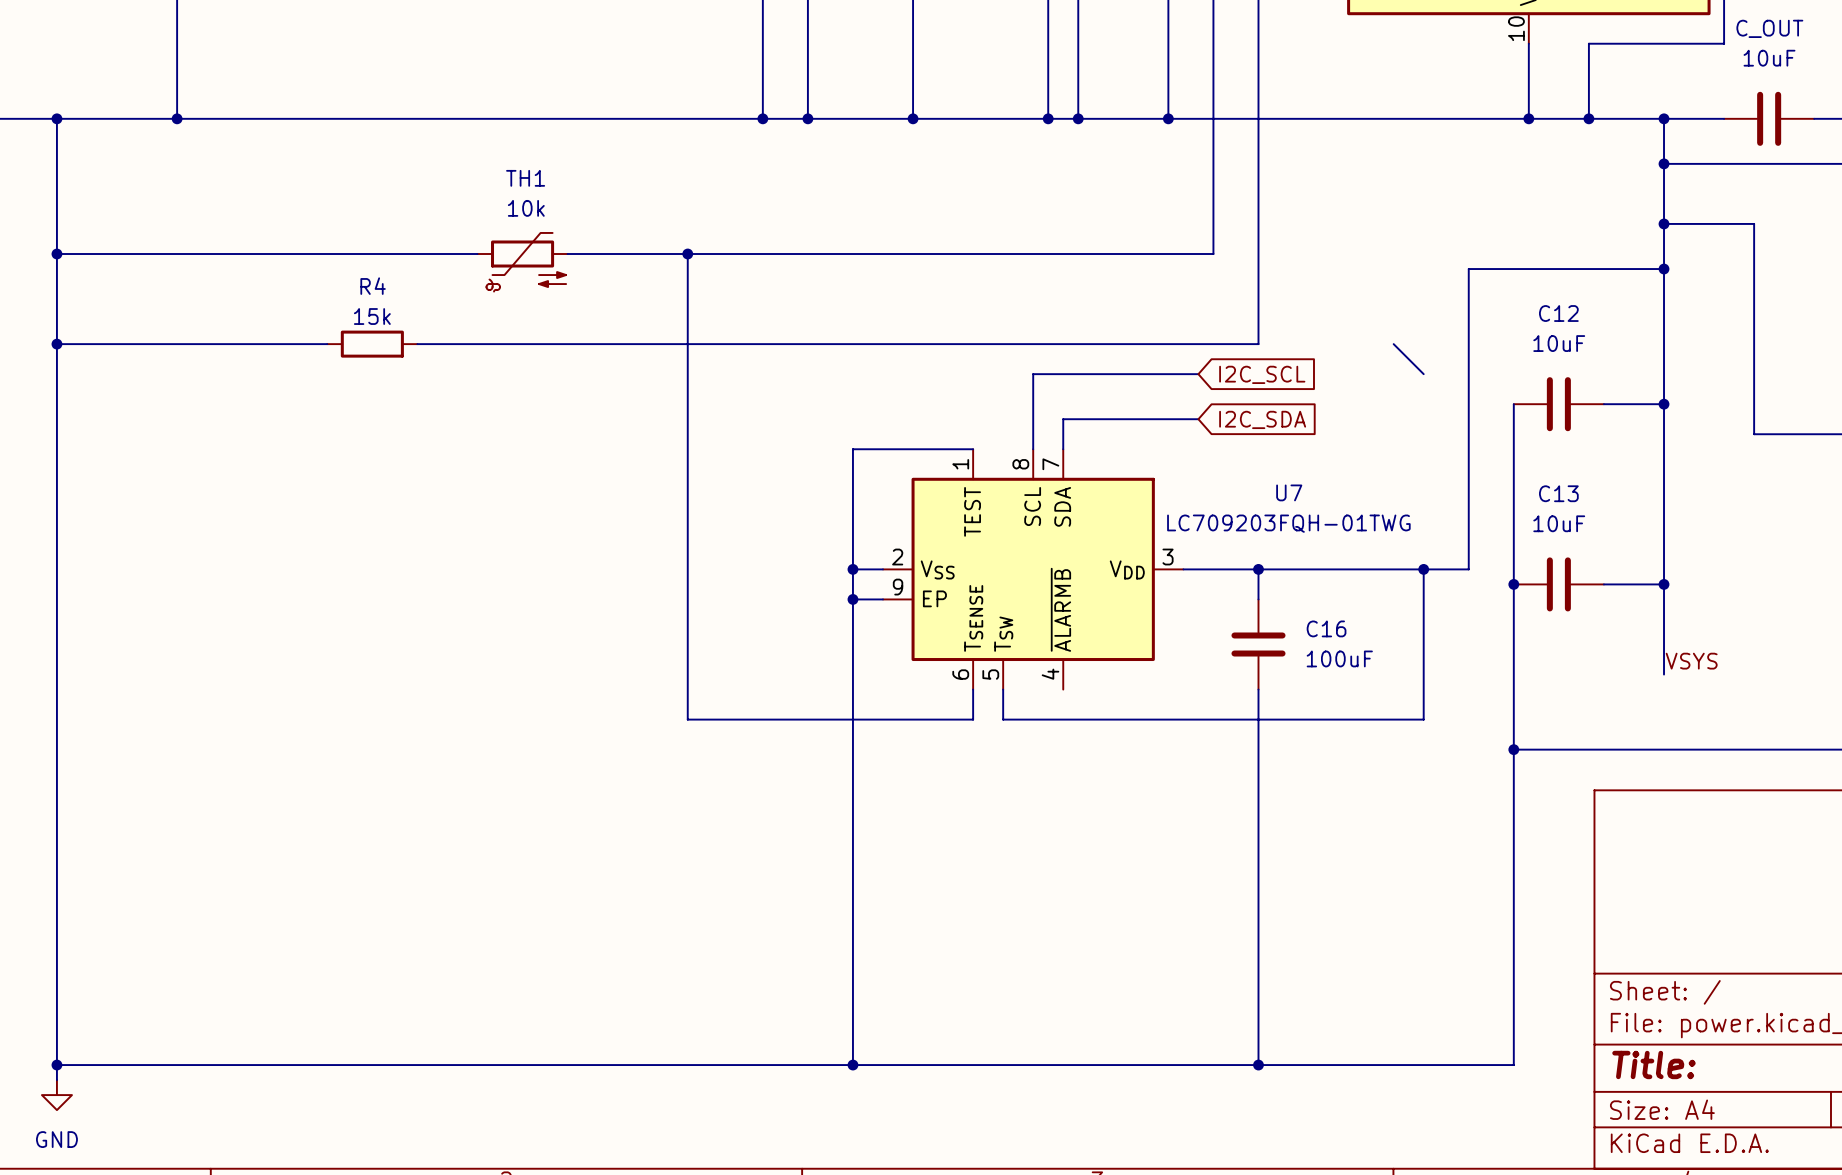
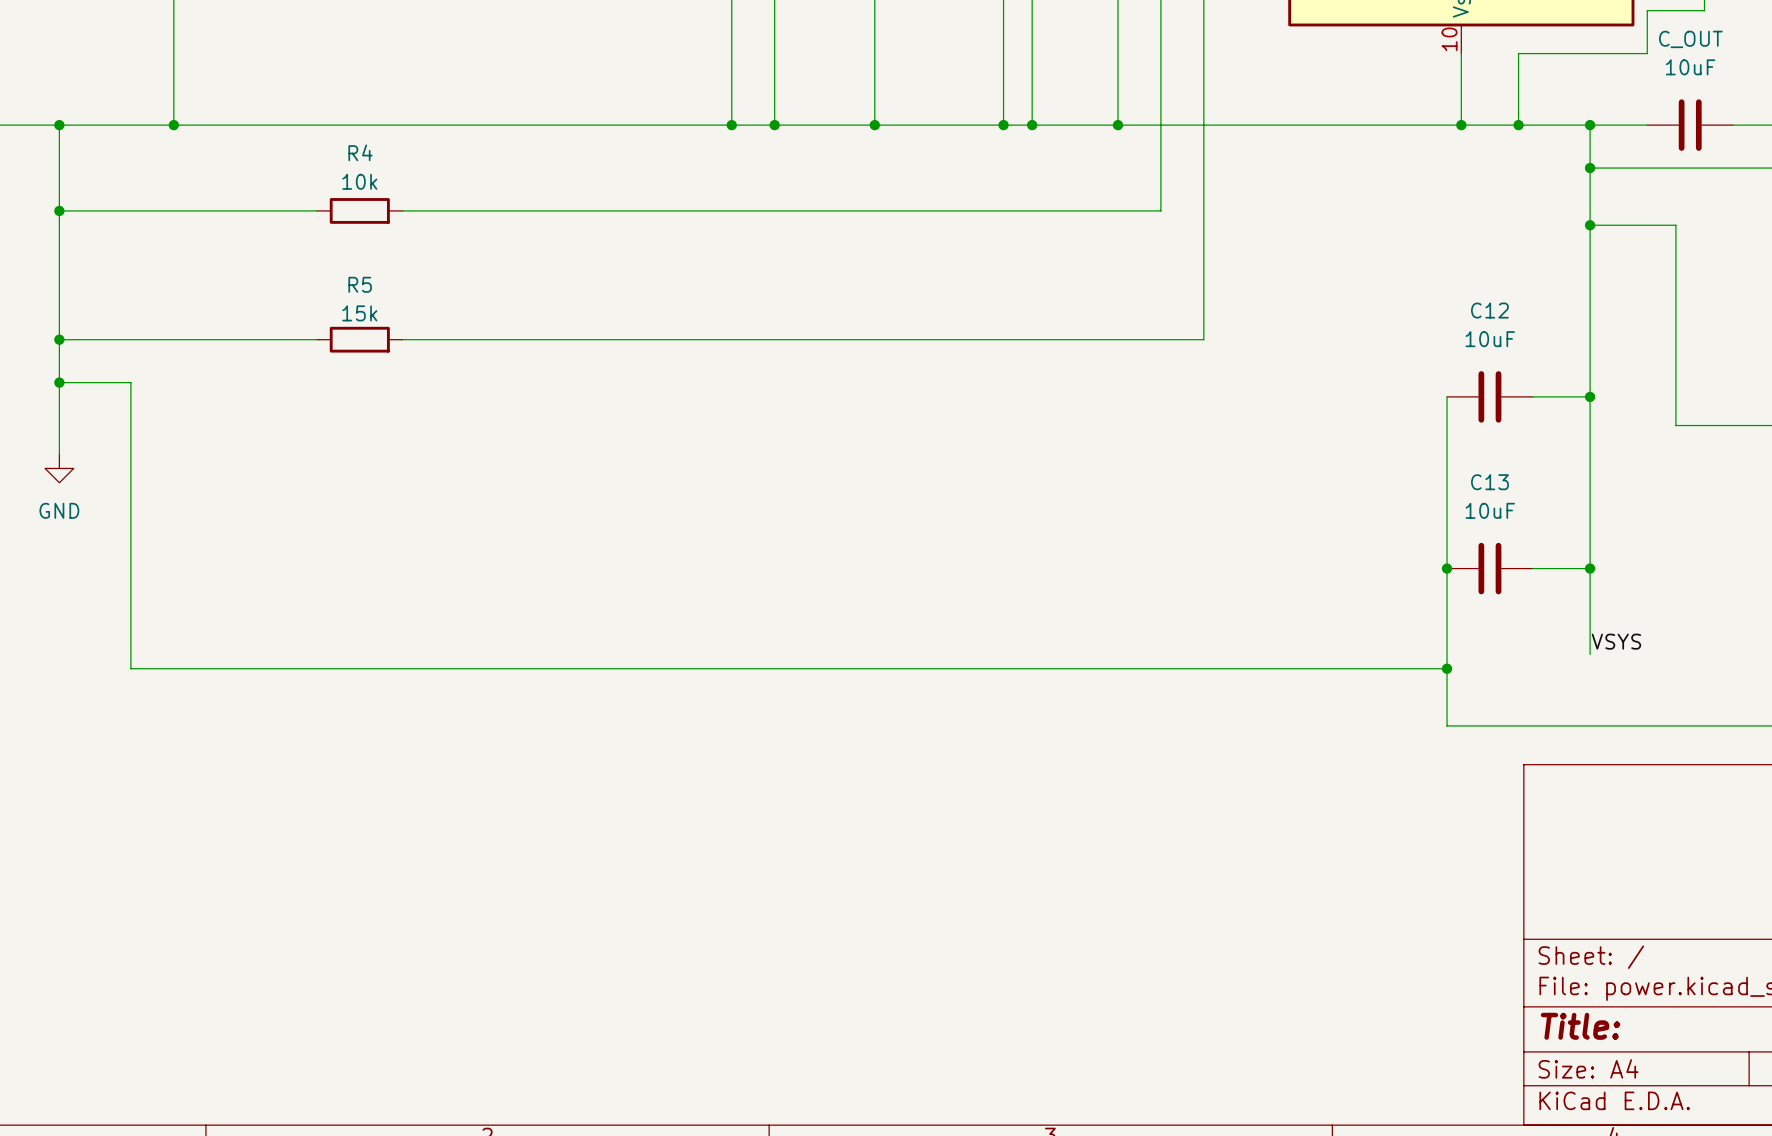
wire: none -> (59, 210) (316, 210)
R4: none -> 10k (359, 210)
wire: (1213, 208) (1213, 254) (567, 254) -> (1160, 210) (402, 210)
wire: (56, 254) (477, 254) -> none
junction position: (56, 254) -> (59, 210)
wire: (687, 254) (687, 719) (973, 719) (973, 689) -> none
junction: (687, 254) -> none
TH1: 10k (522, 262) -> none
wire: (1664, 269) (1468, 269) (1468, 569) (1183, 569) -> none
junction: (1664, 269) -> none
R4 name: R4 (373, 286) -> R5 (360, 284)
wire: (1393, 344) (1423, 374) -> none
wire: (1198, 374) (1033, 374) (1033, 449) -> none
global label: I2C_SCL (1262, 374) -> none
wire: none -> (59, 382) (130, 382) (130, 668) (1447, 668)
junction: none -> (59, 382)
wire: (1198, 419) (1063, 419) (1063, 449) -> none
global label: I2C_SDA (1262, 419) -> none
wire: (973, 449) (852, 449) (852, 1065) -> none
wire: (56, 464) (56, 1080) -> none
power symbol: none -> GND (59, 468)
wire: (852, 569) (883, 569) -> none
junction: (852, 569) -> none
U7: LC709203FQH-01TWG (1033, 569) -> none
wire: (1258, 569) (1258, 599) -> none
junction: (1258, 569) -> none
wire: (1423, 569) (1423, 719) (1003, 719) (1003, 689) -> none
junction: (1423, 569) -> none
wire: (852, 599) (883, 599) -> none
junction: (852, 599) -> none
C16: 100uF (1258, 644) -> none
wire: (1258, 689) (1258, 1065) -> none
wire: (1513, 749) (1513, 1065) (56, 1065) -> none
junction position: (1513, 749) -> (1447, 668)
junction: (56, 1065) -> none
junction: (852, 1065) -> none
junction: (1258, 1065) -> none
power symbol: GND (56, 1095) -> none

